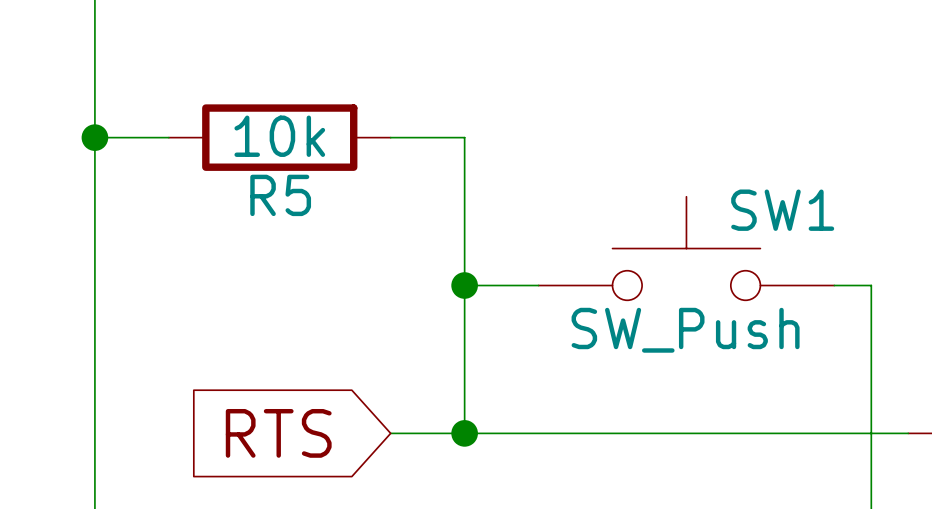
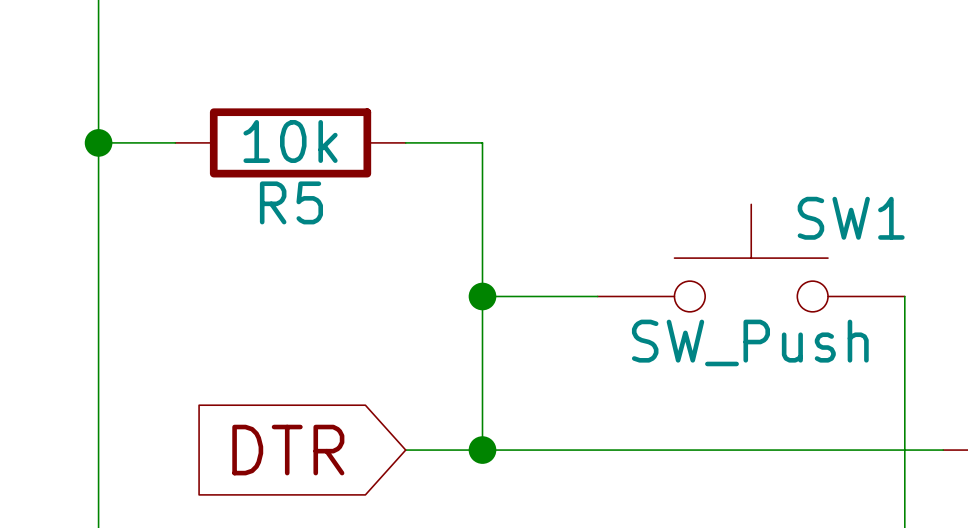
SW1 position: (686, 248) -> (751, 258)
global label: RTS (278, 433) -> DTR (288, 450)

